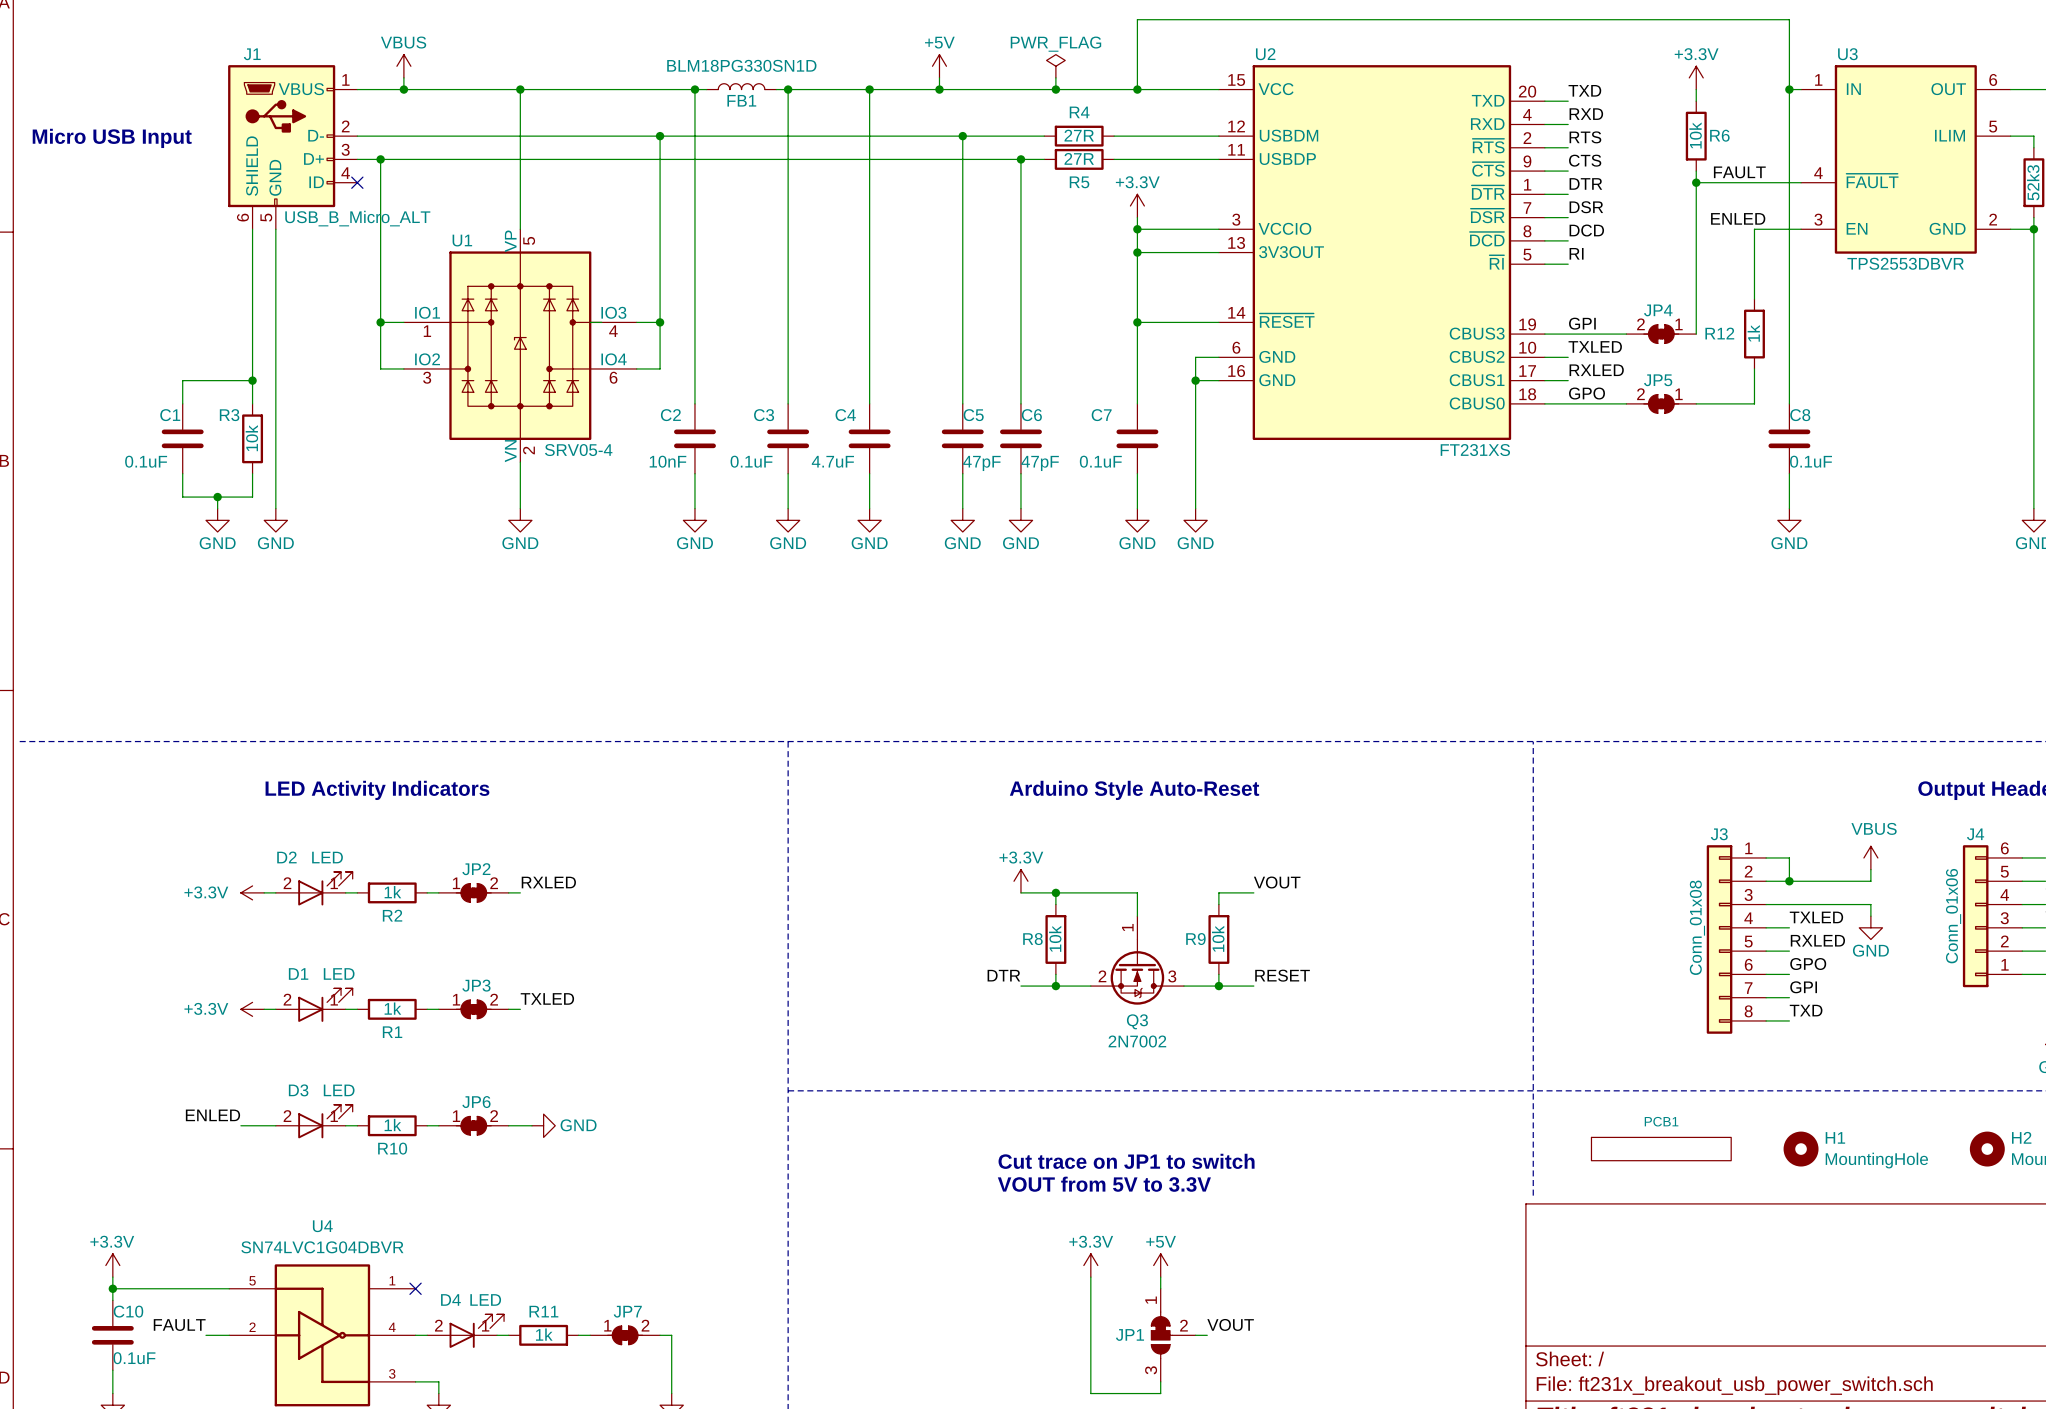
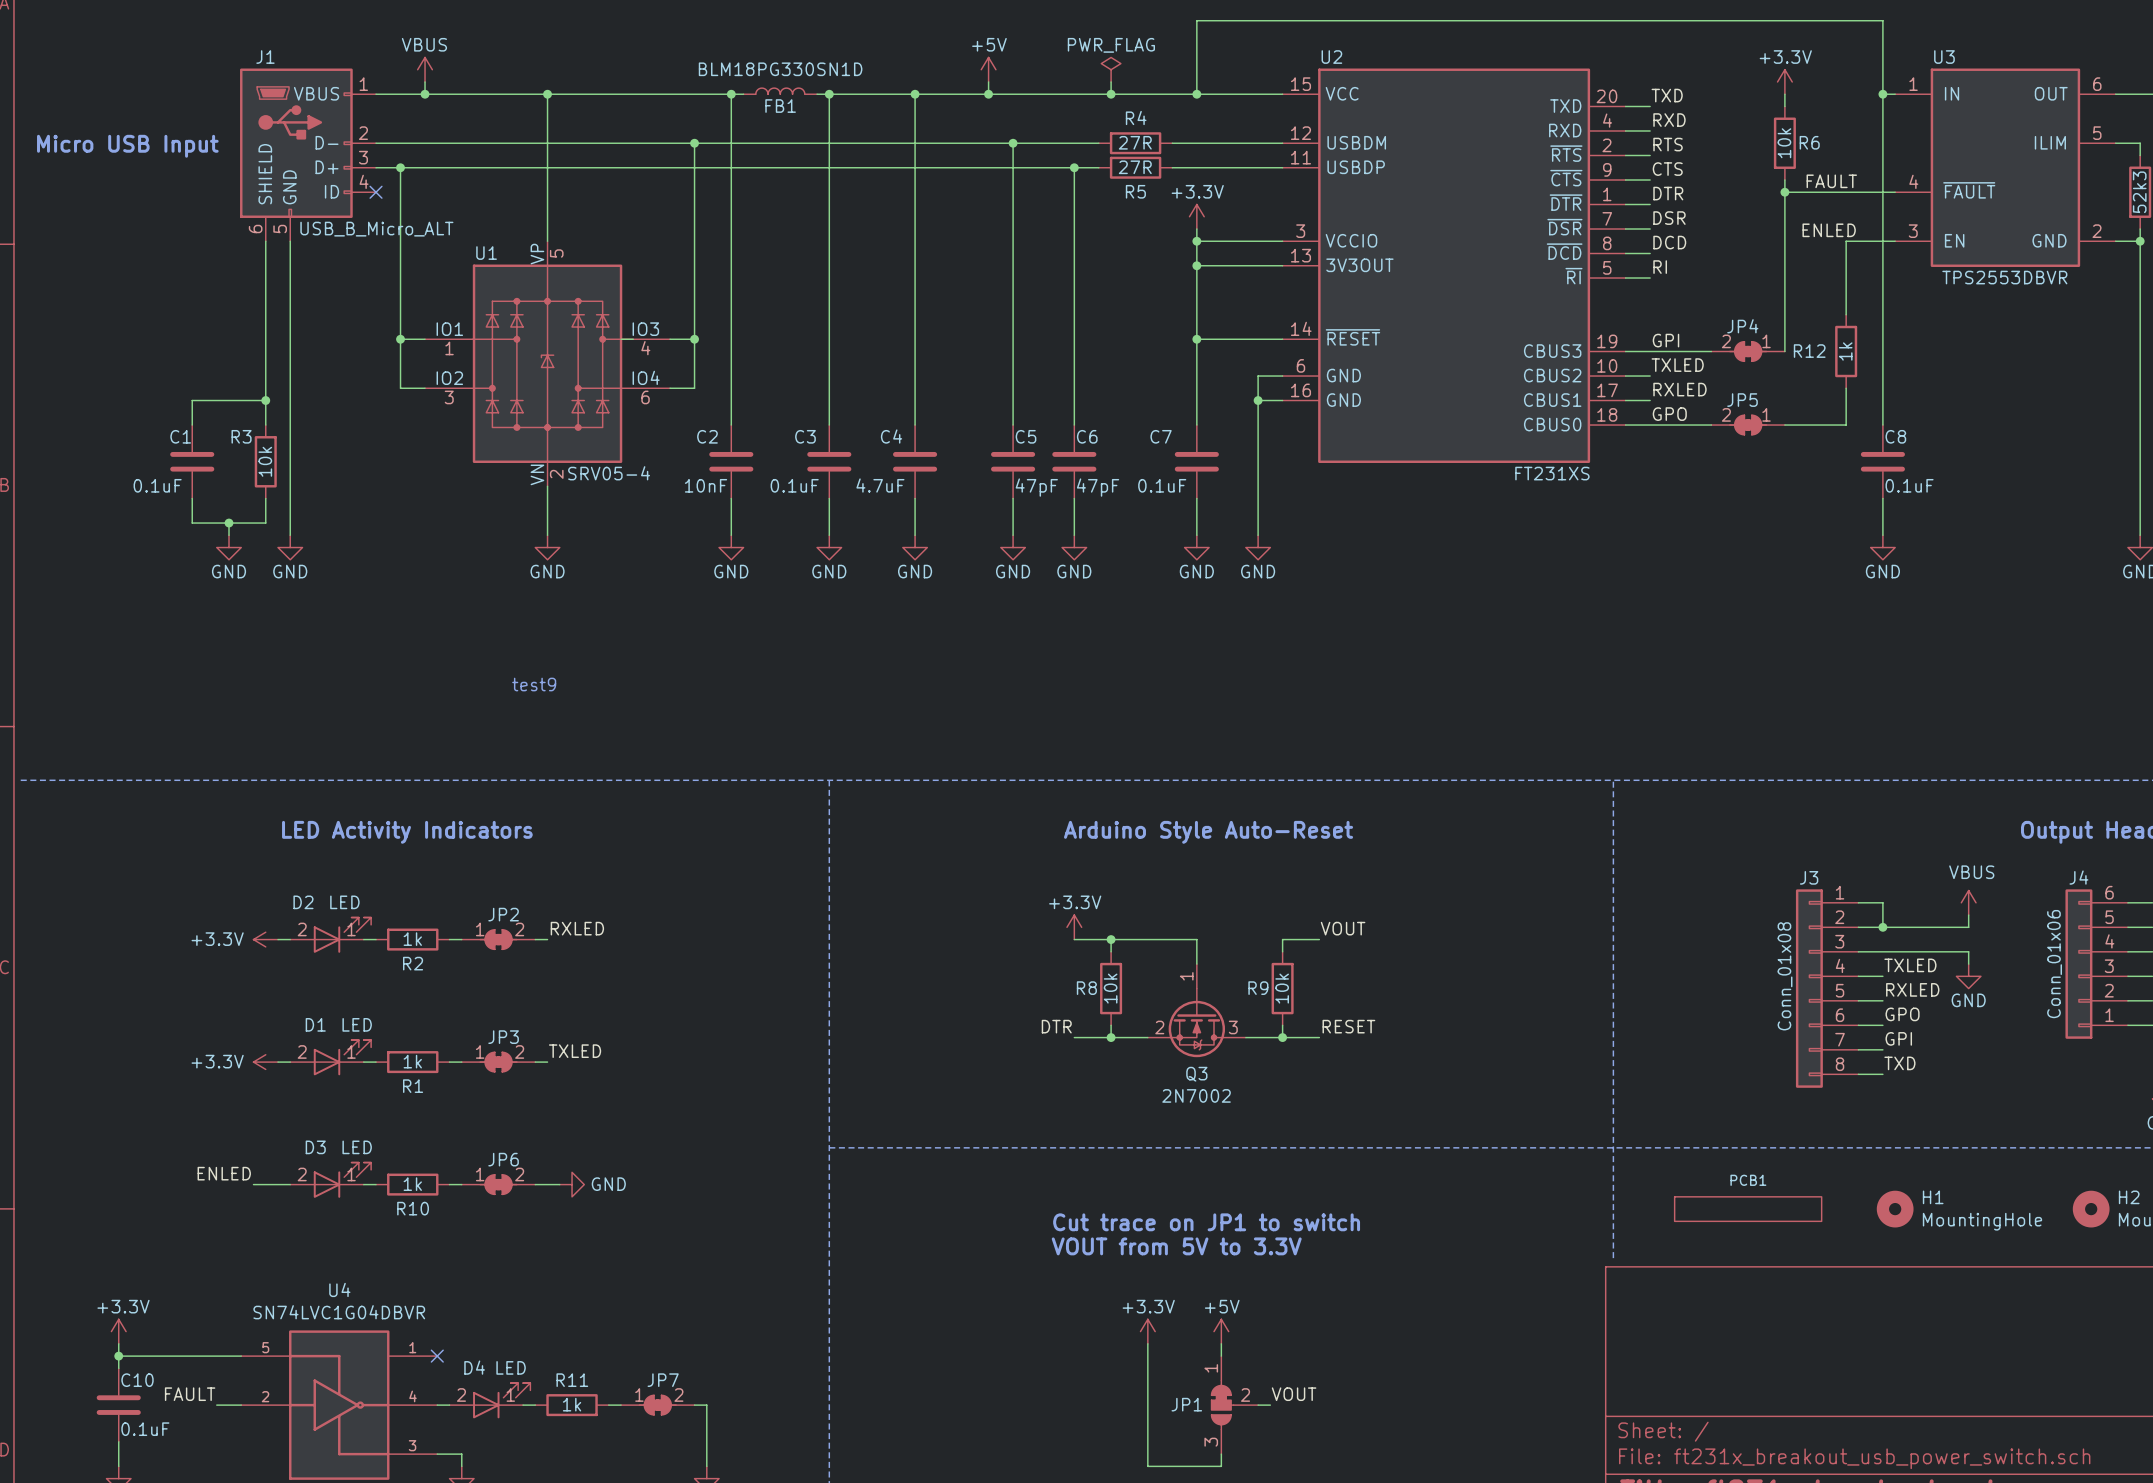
text: none -> test9 (534, 684)

